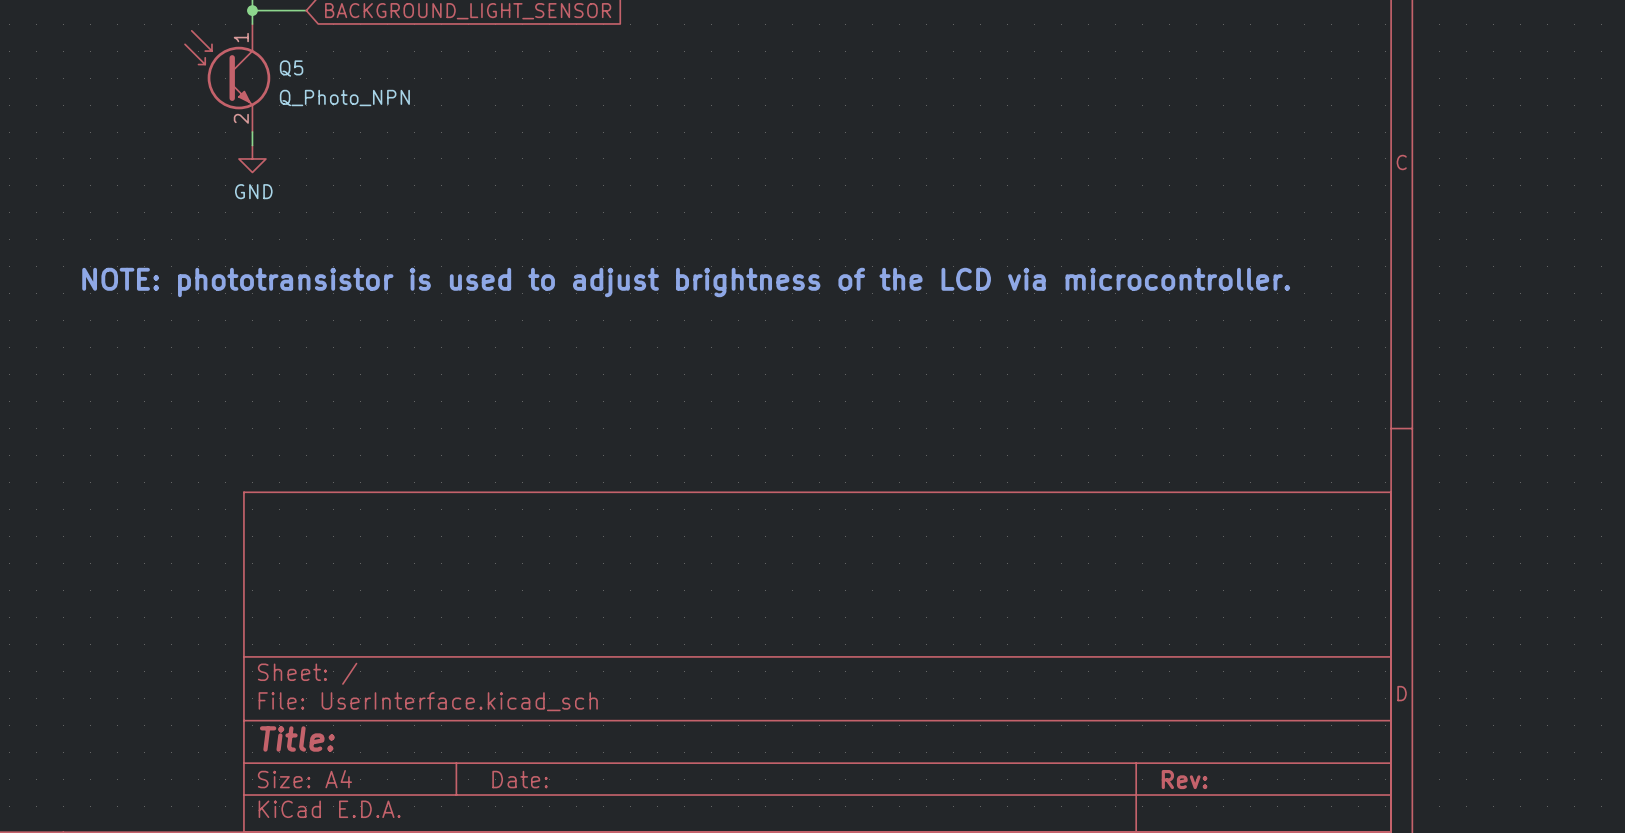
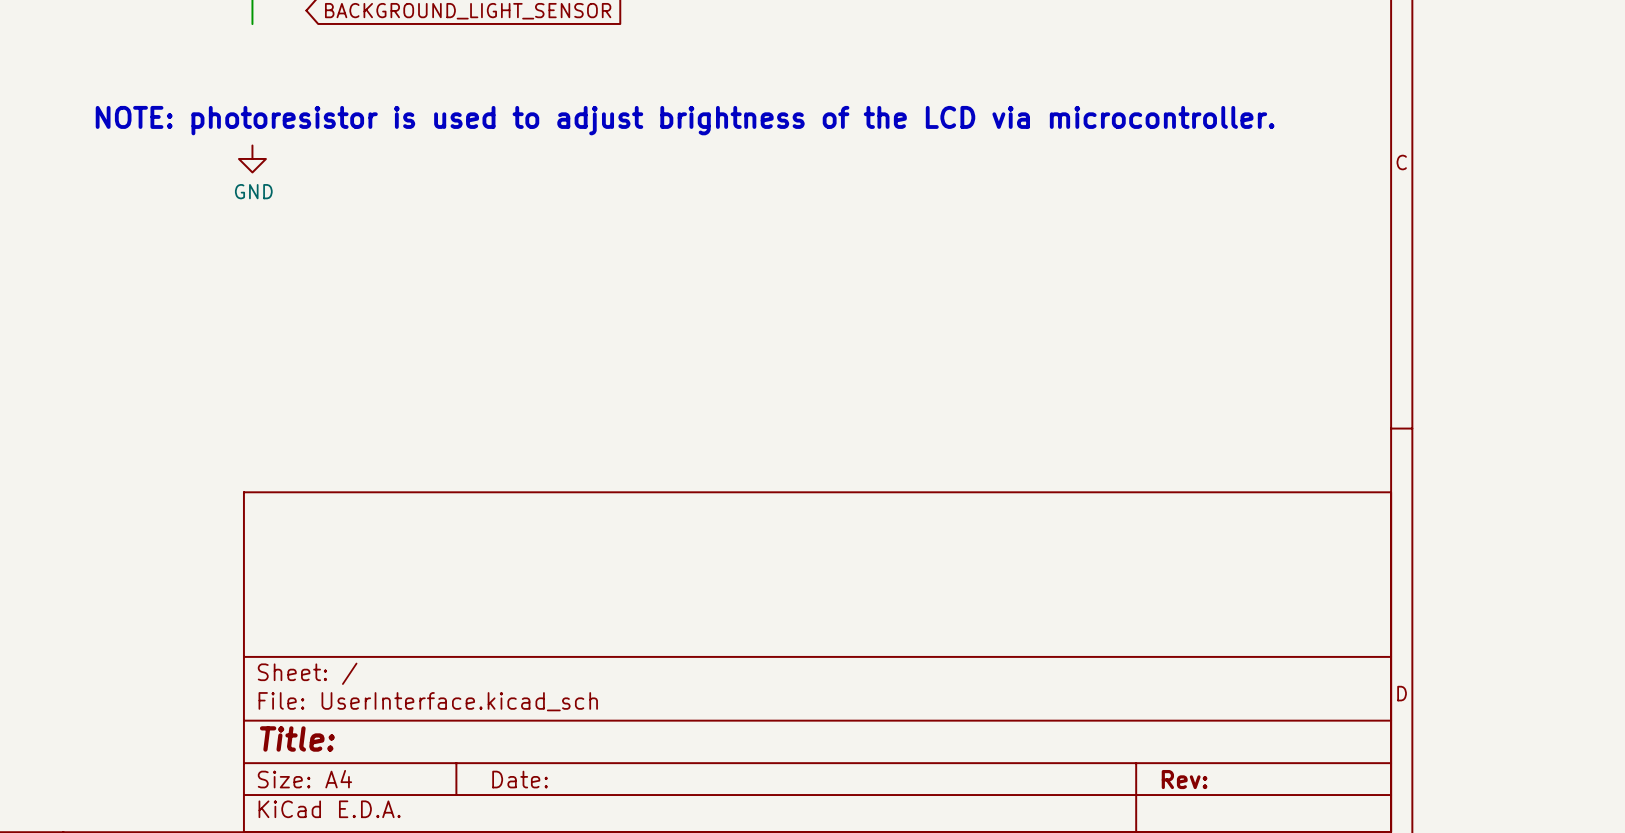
wire: (252, 10) (306, 10) -> none
junction: (252, 10) -> none
Q5: Q_Photo_NPN (227, 78) -> none
text: none -> NOTE: photoresistor is used to adjust brightness of the LCD via microcontroller. (685, 120)
wire: (252, 132) (252, 145) -> none
text: NOTE: phototransistor is used to adjust brightness of the LCD via microcontroller. (686, 282) -> none

